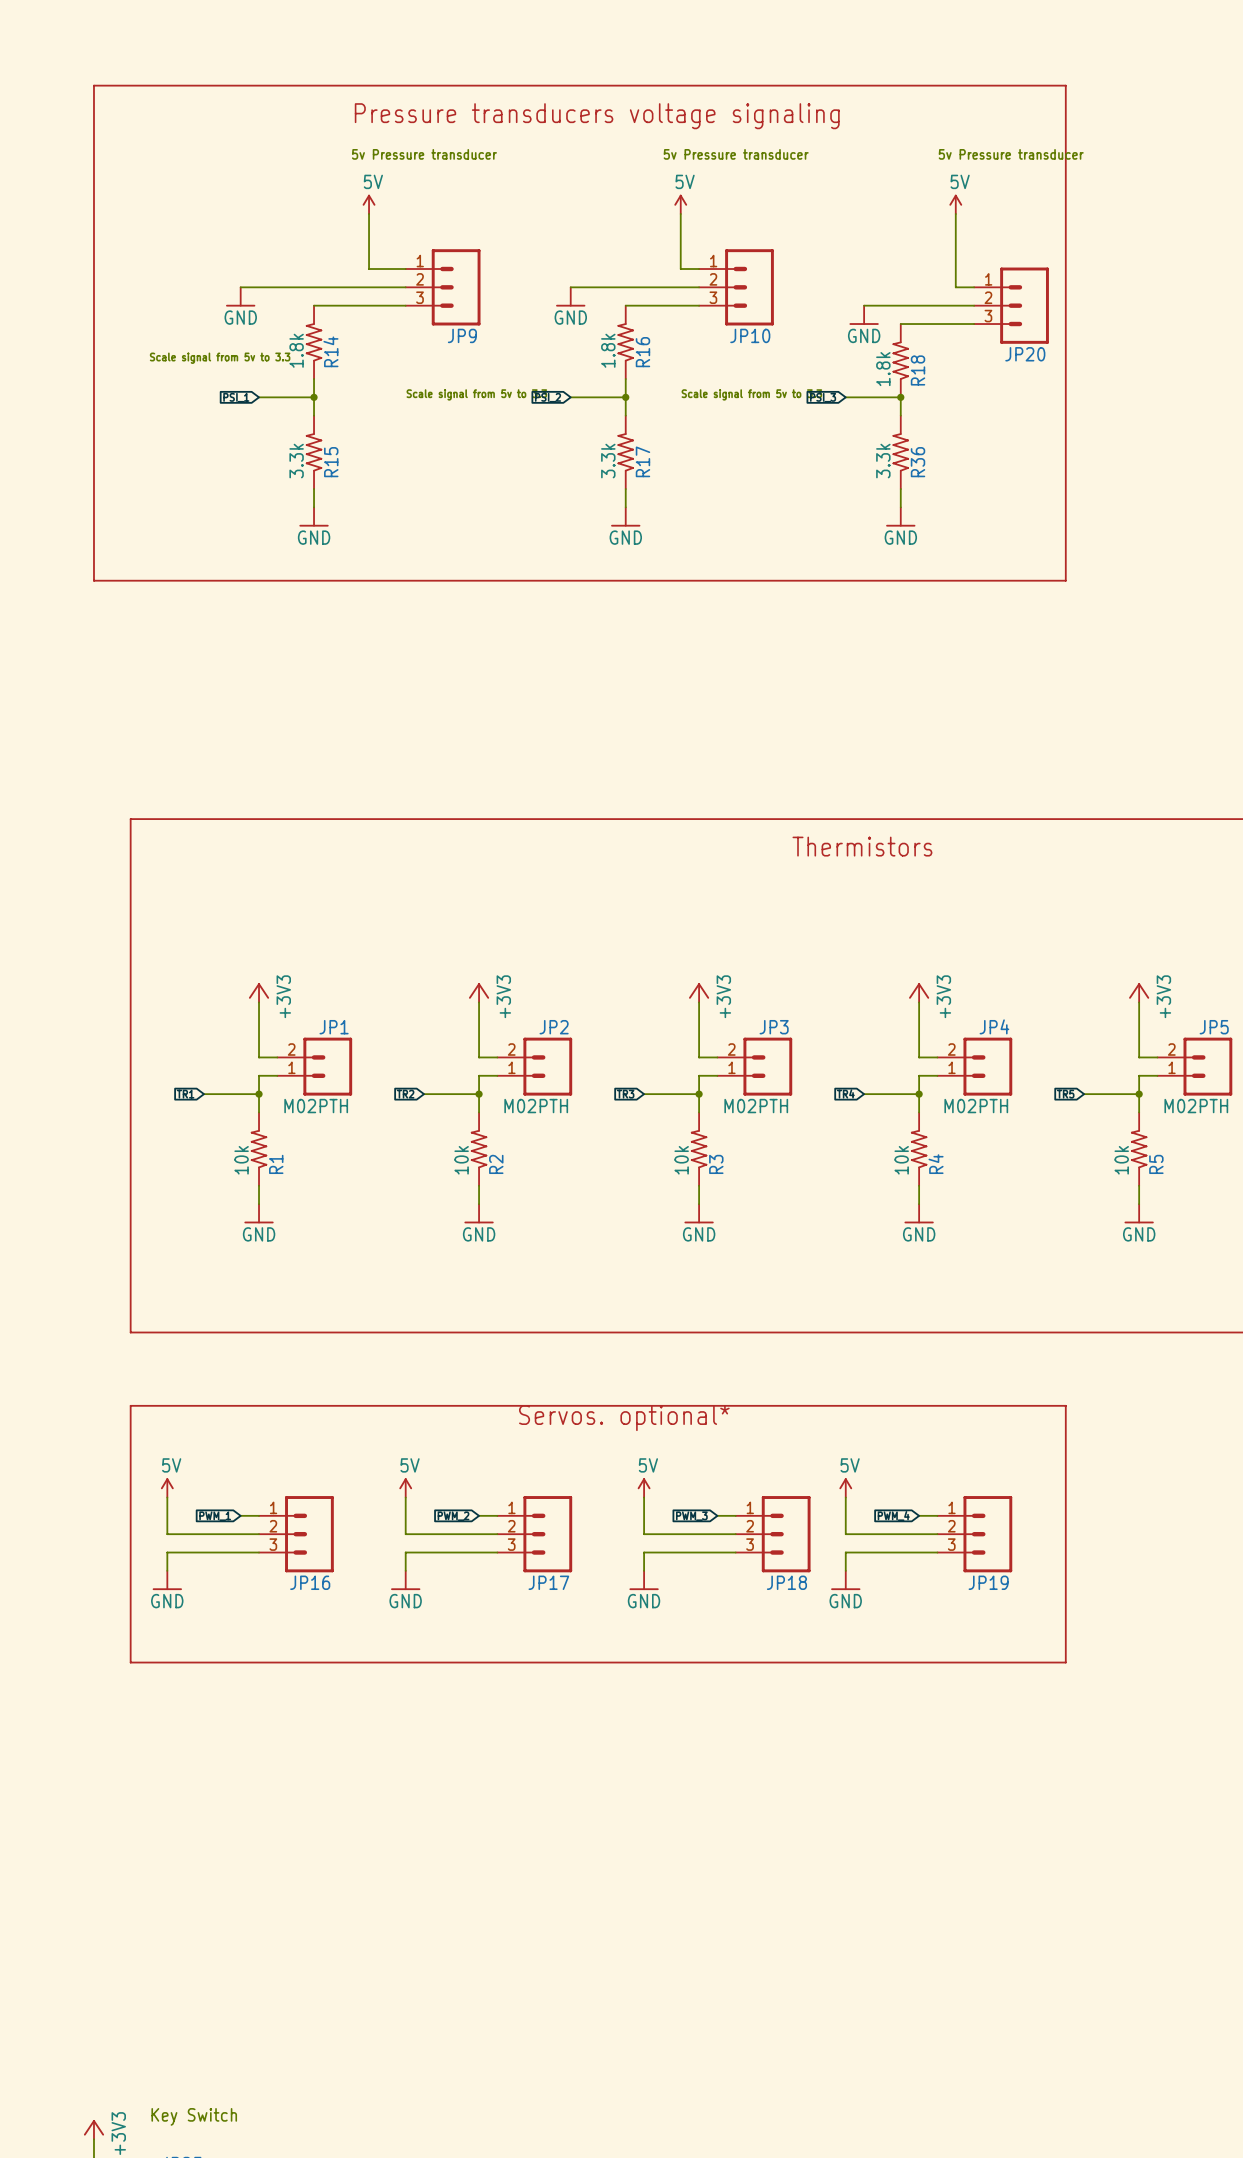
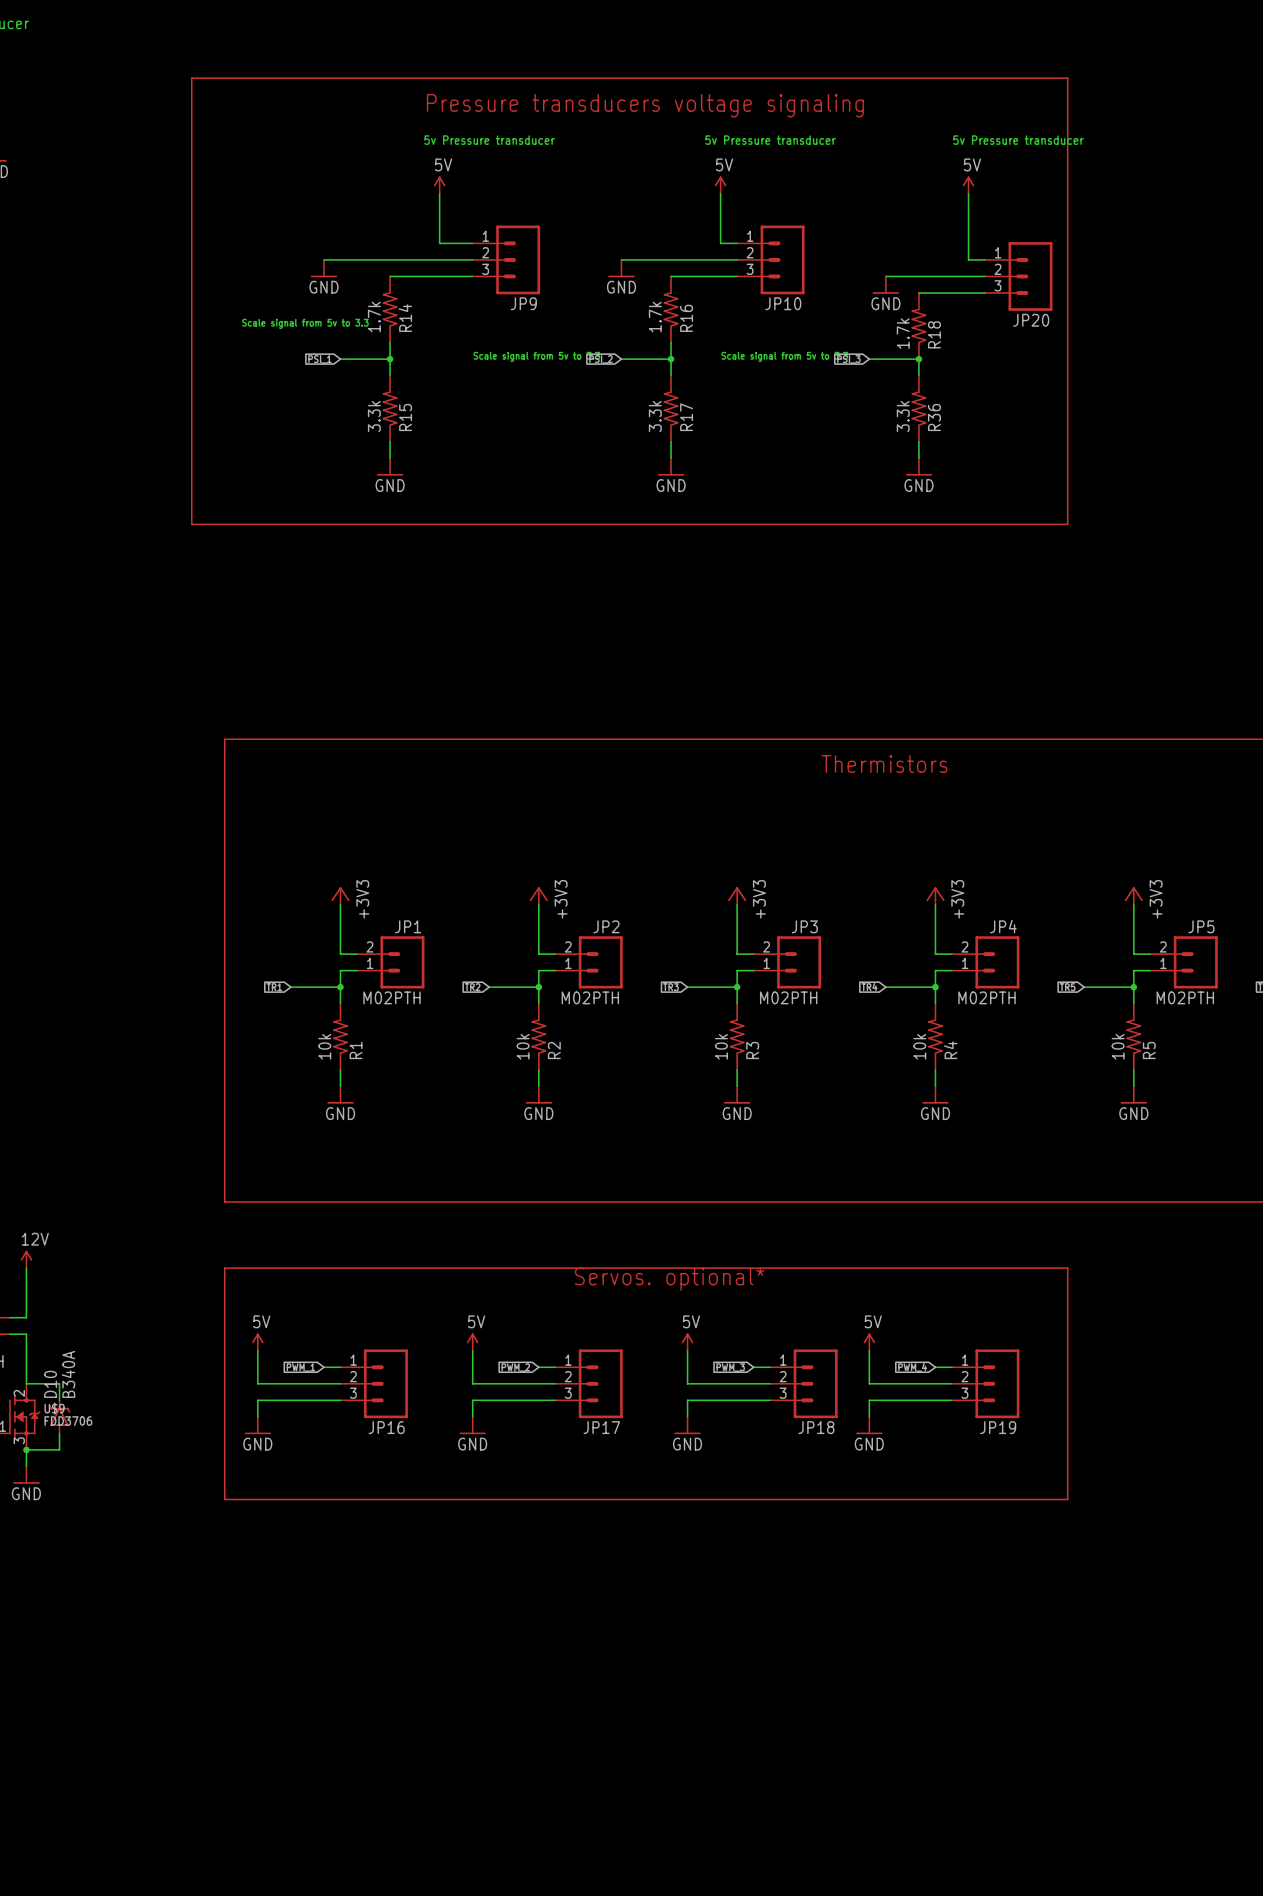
R14 value: 1.8k (296, 350) -> 1.7k (374, 317)
R16 value: 1.8k (608, 350) -> 1.7k (655, 317)
R18 value: 1.8k (883, 369) -> 1.7k (903, 333)

